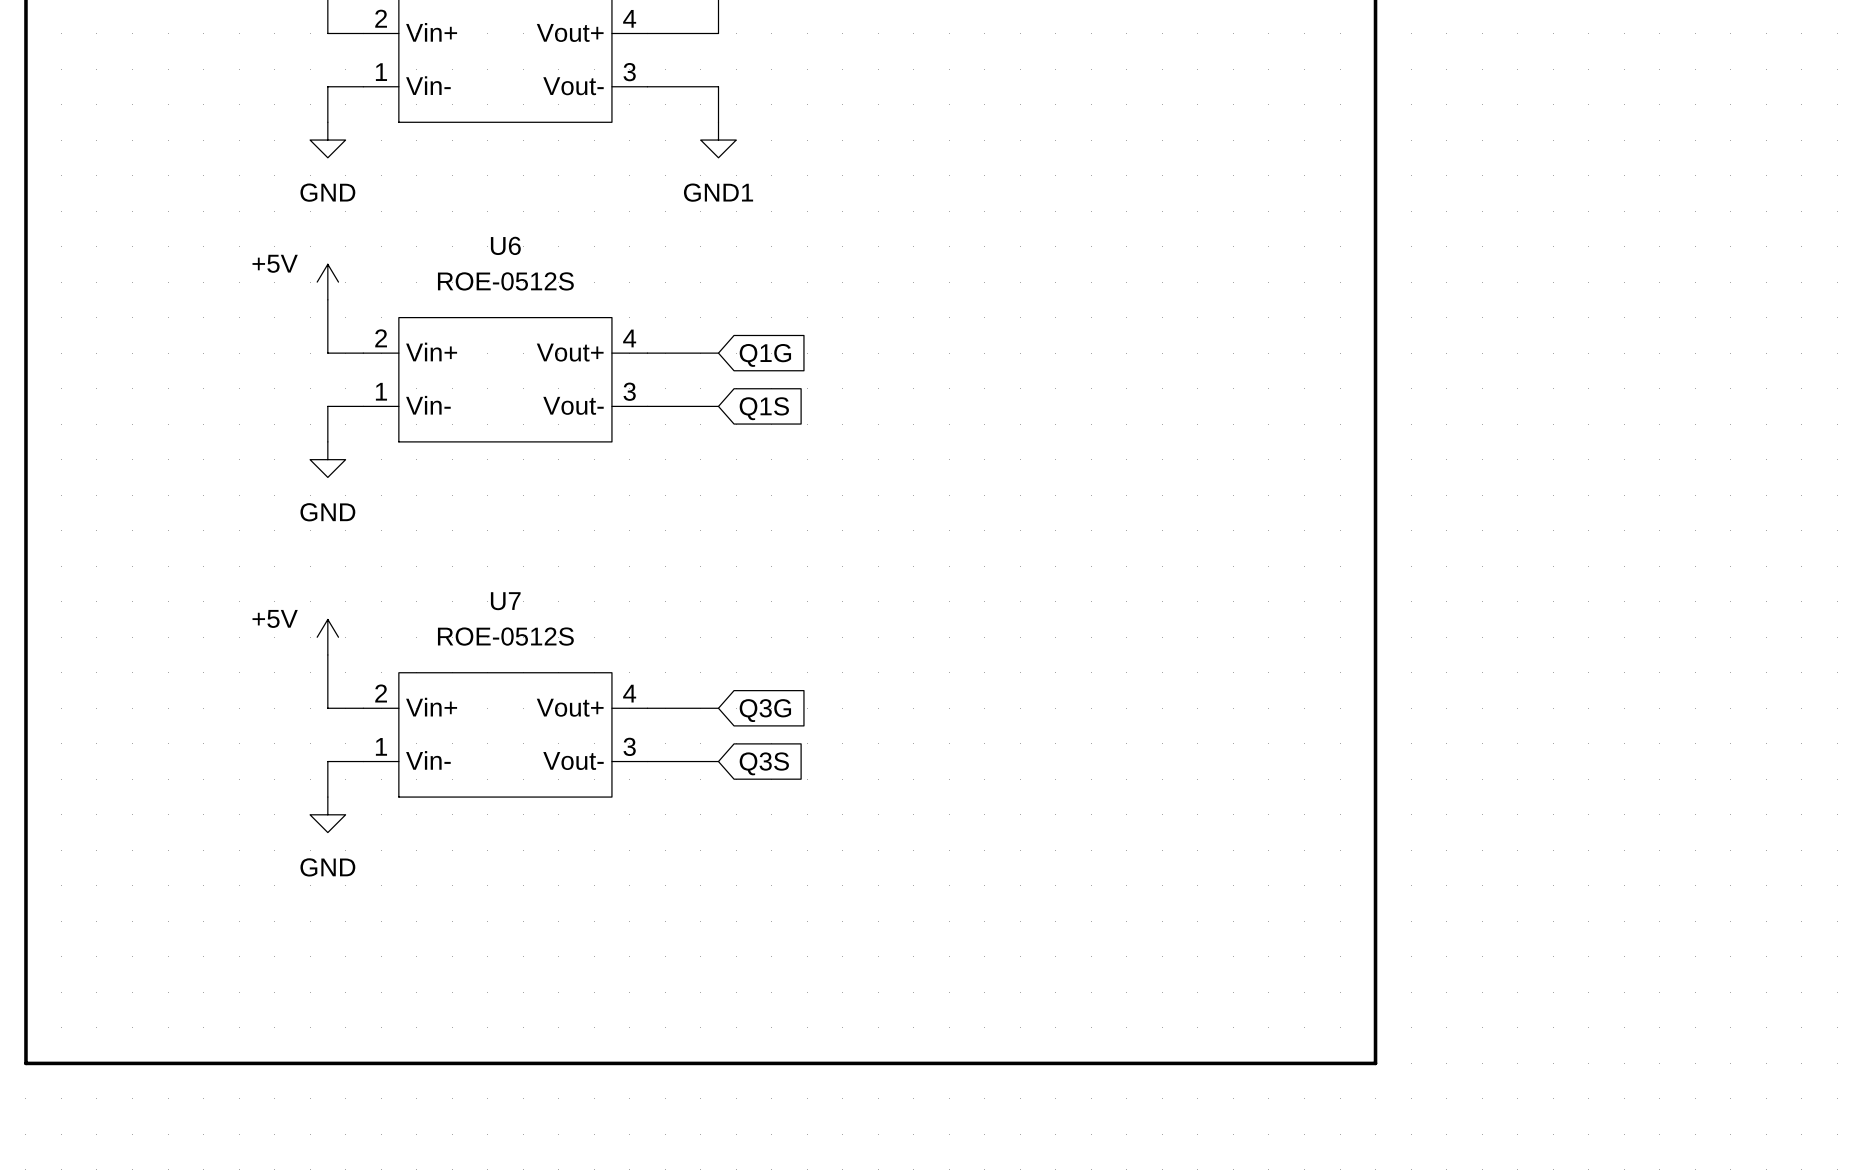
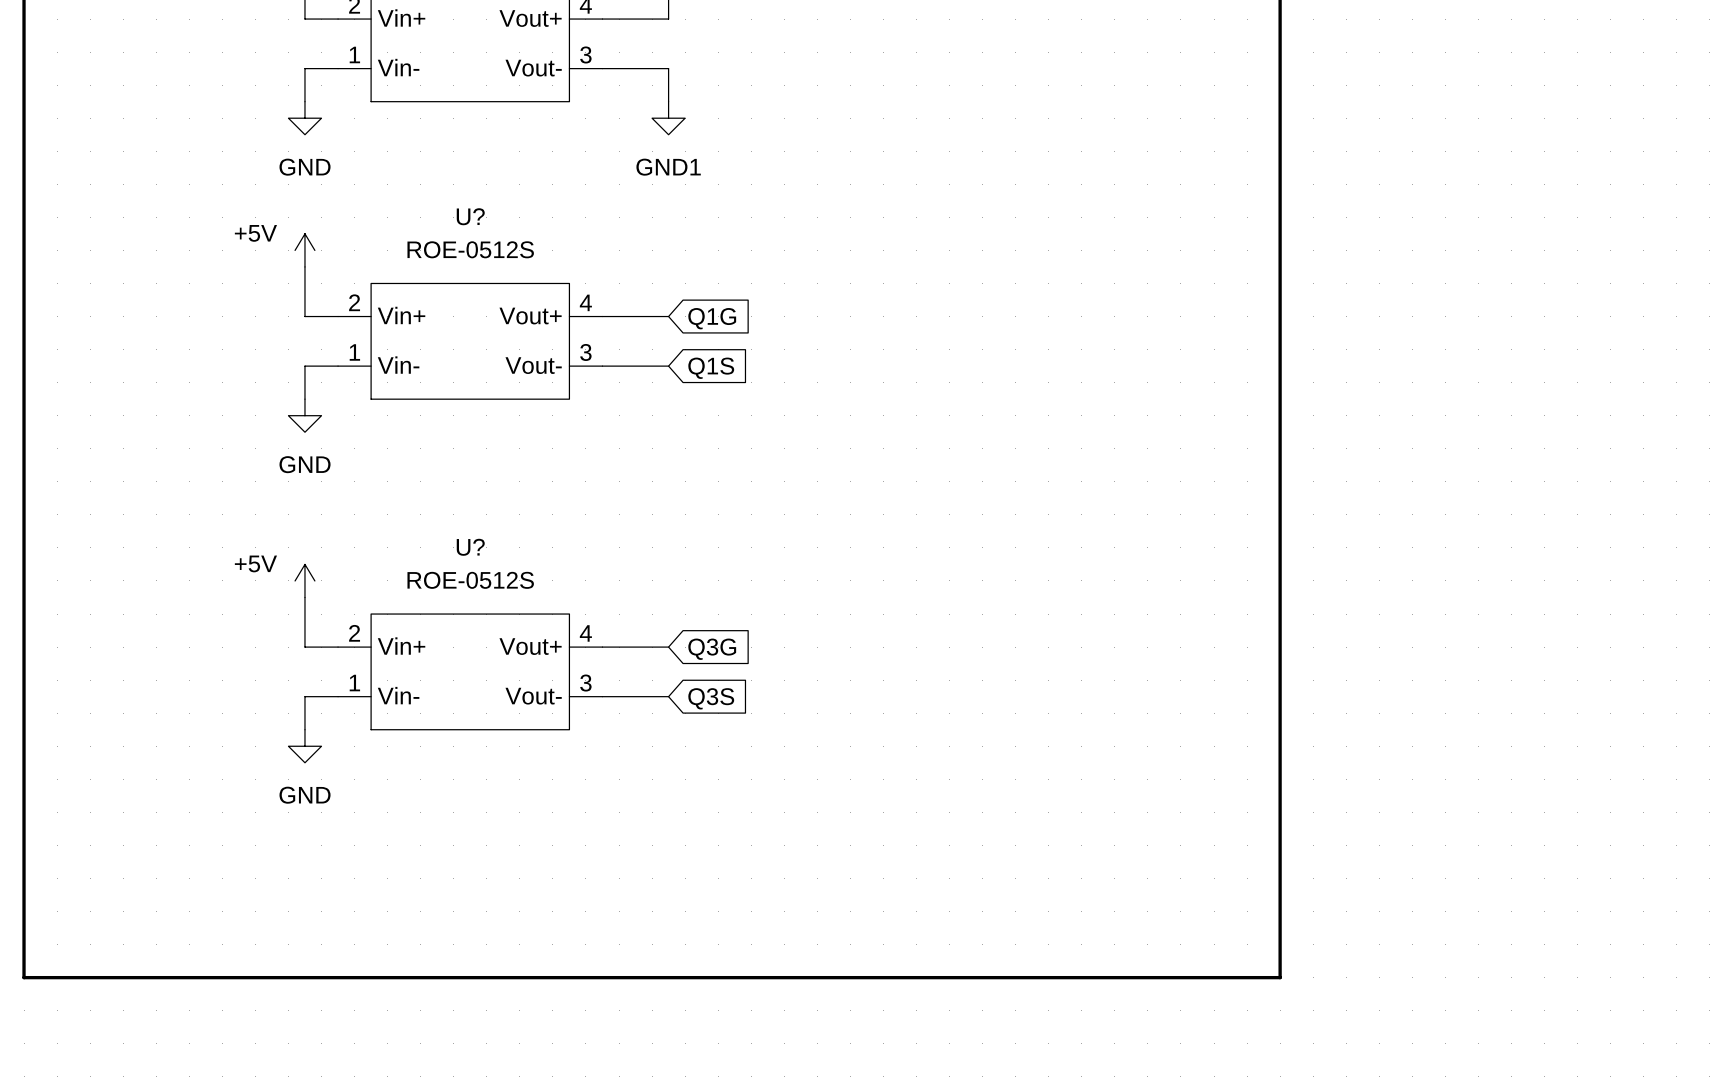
U6 name: U6 (505, 245) -> U? (470, 216)
U7 name: U7 (505, 601) -> U? (470, 547)

